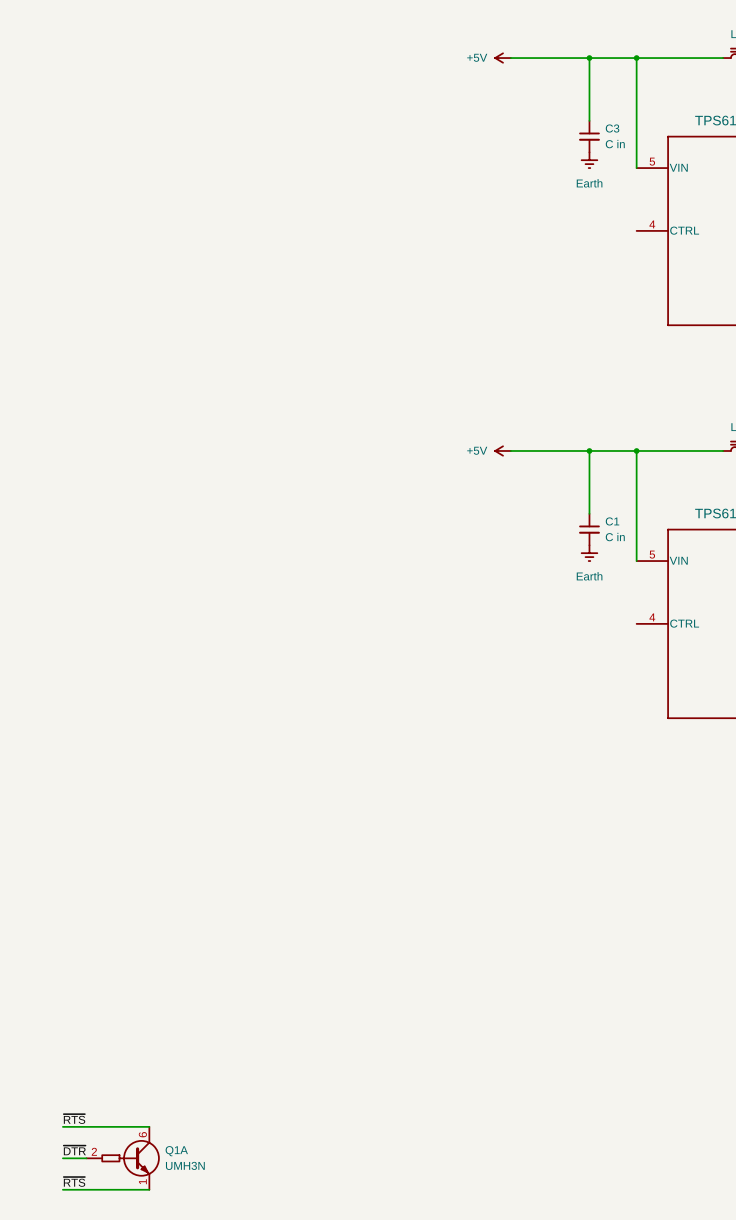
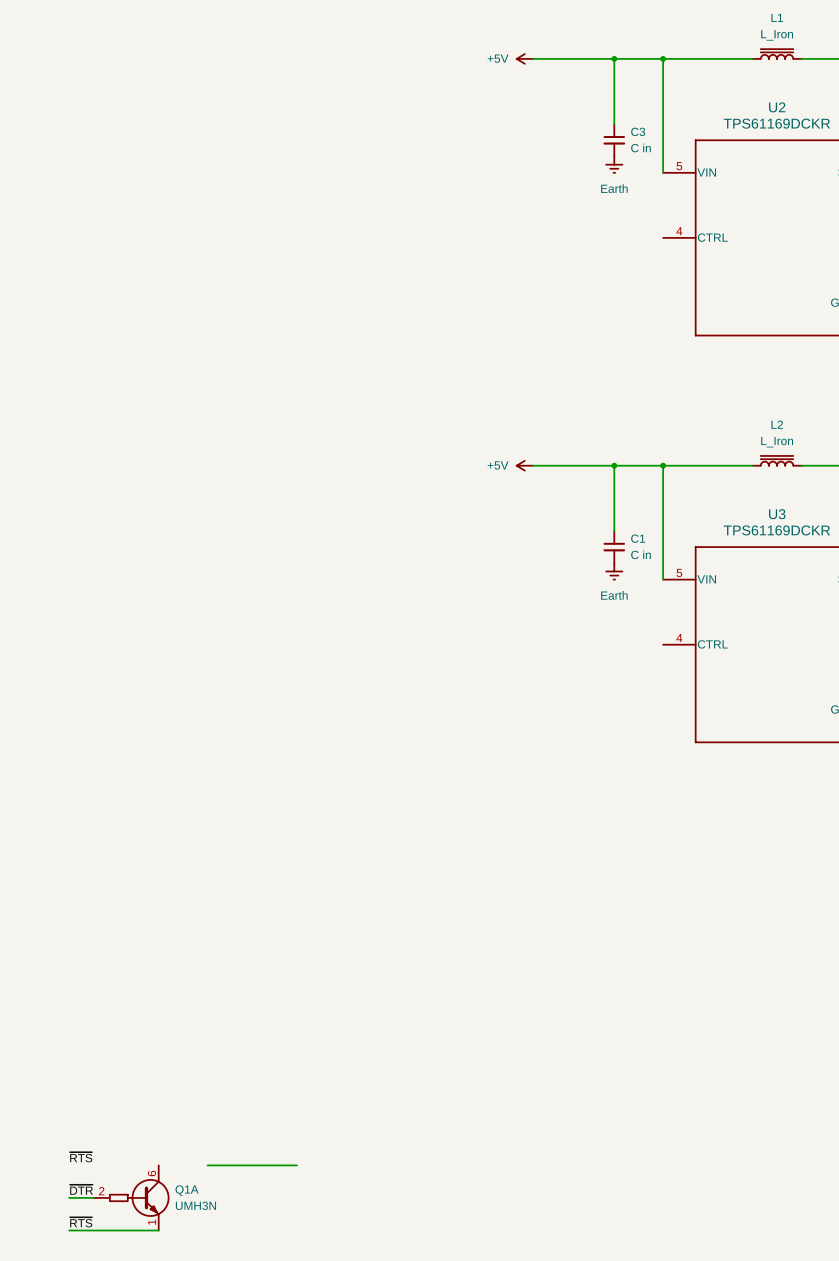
wire: (62, 1126) (149, 1126) -> (207, 1165) (297, 1165)

